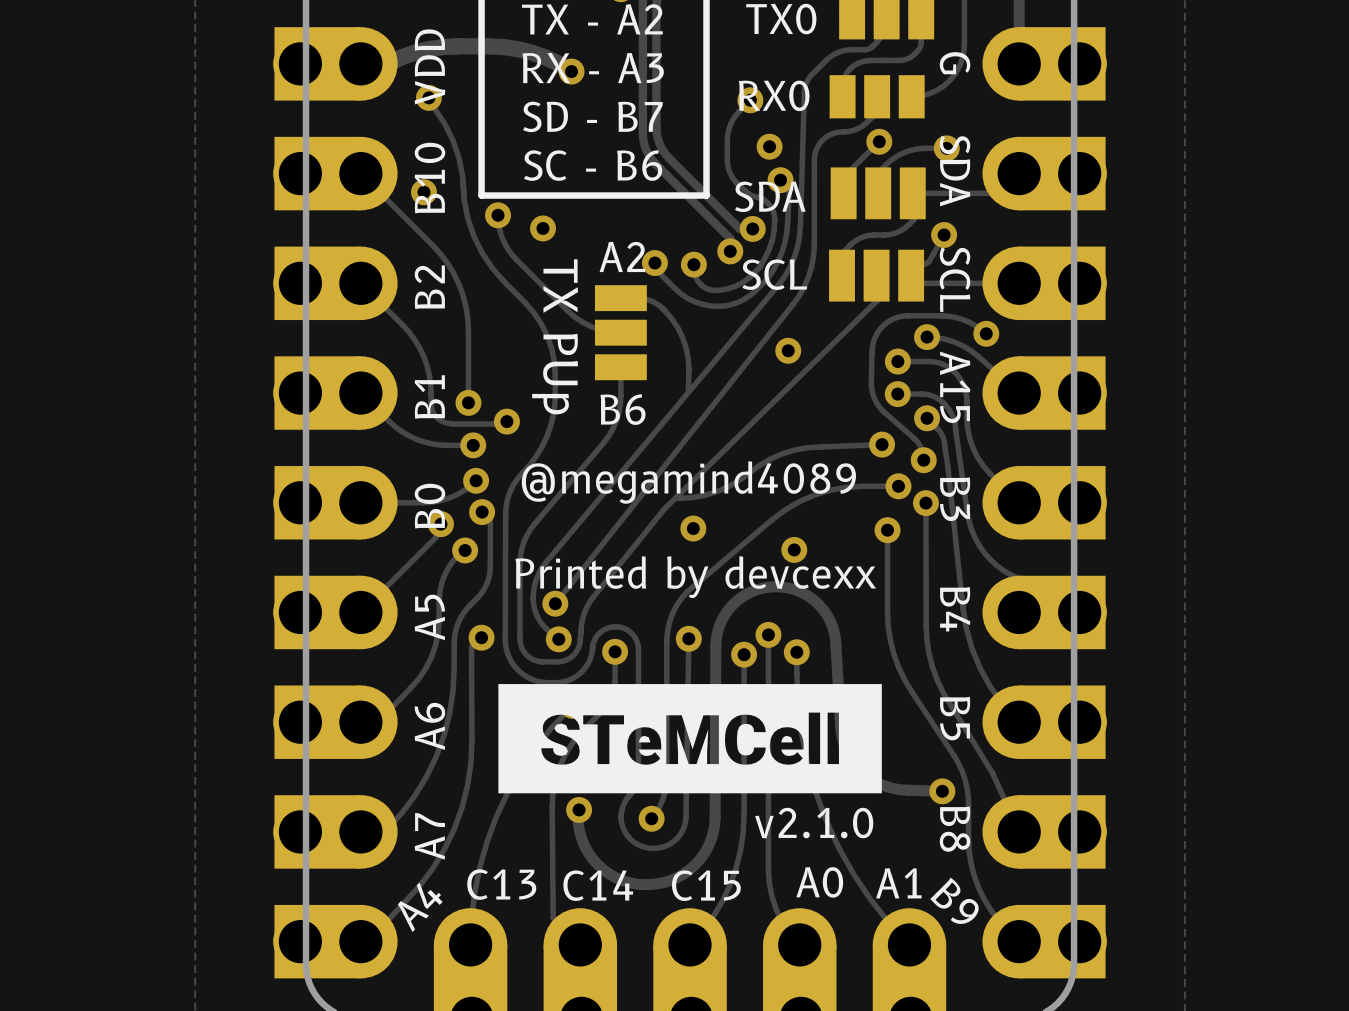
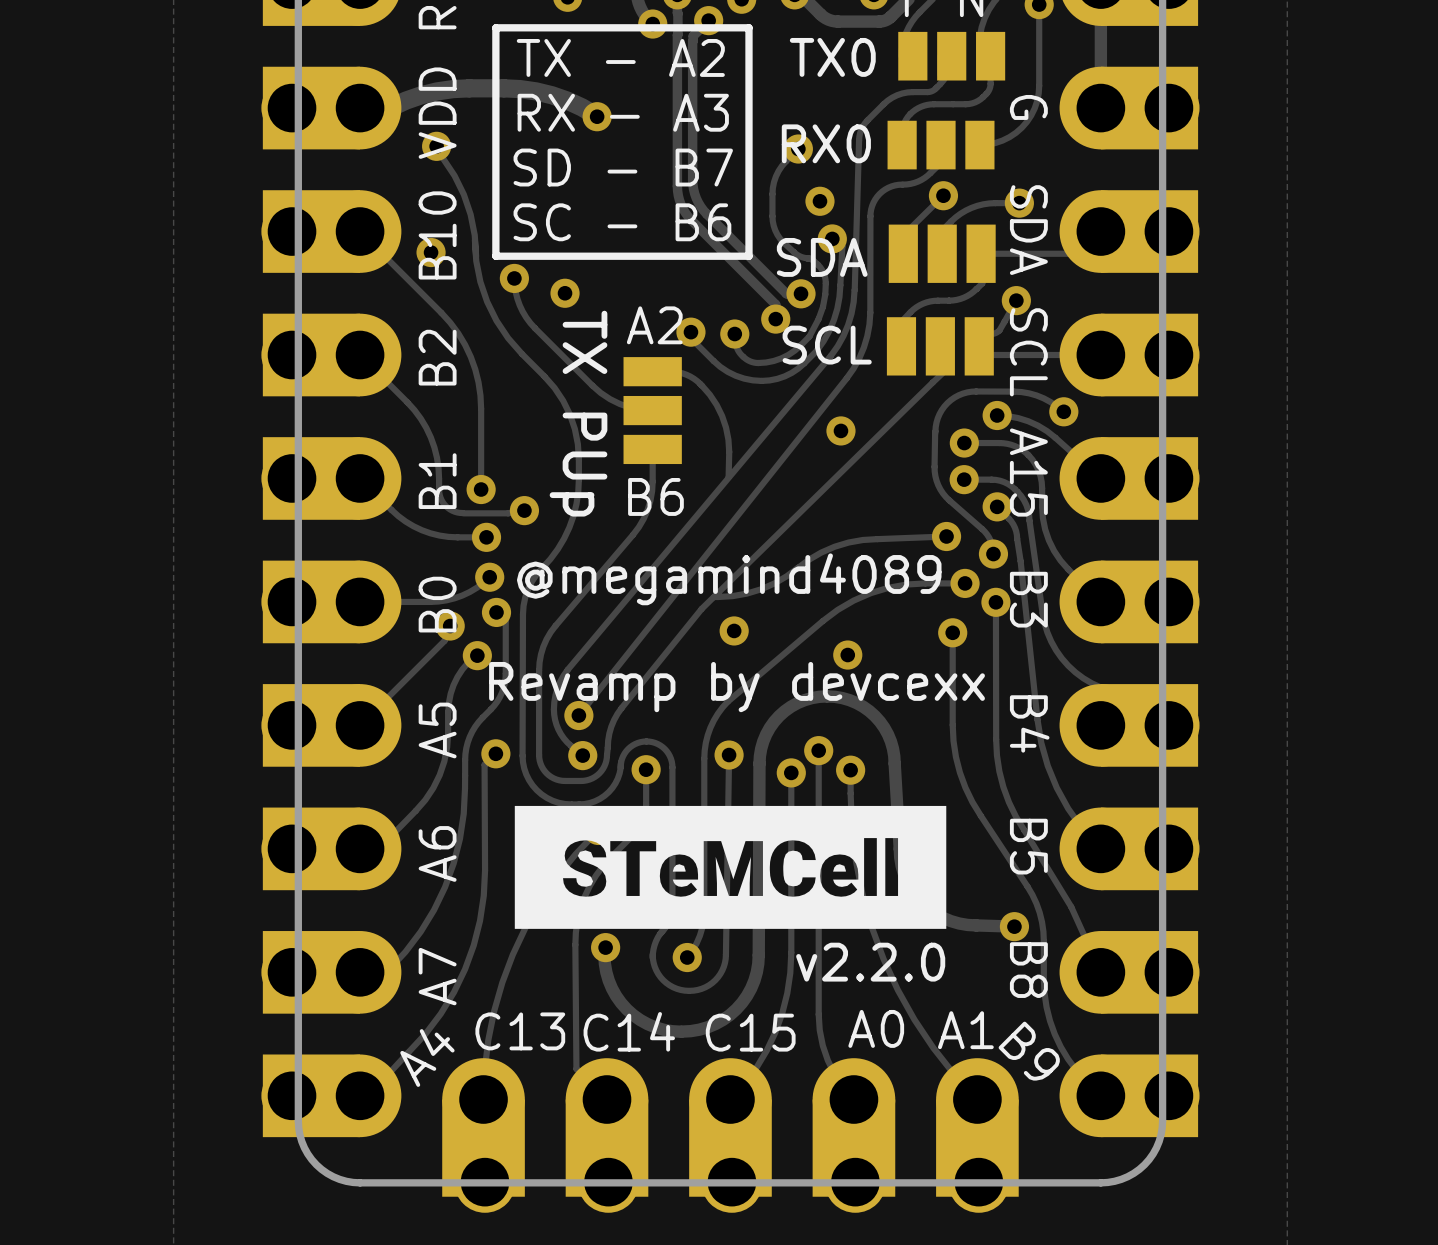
text: Printed by devcexx (695, 577) -> Revamp by devcexx (737, 687)
text: v2.1.0 (814, 823) -> v2.2.0 (870, 962)

